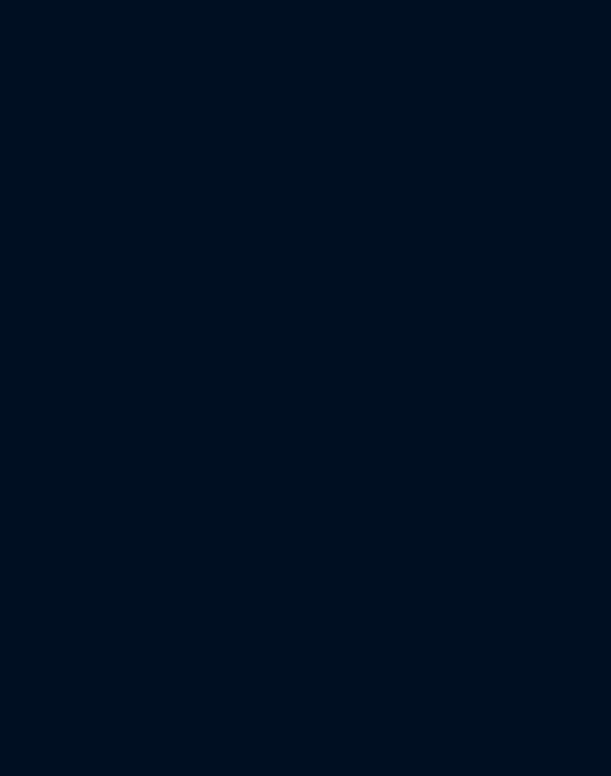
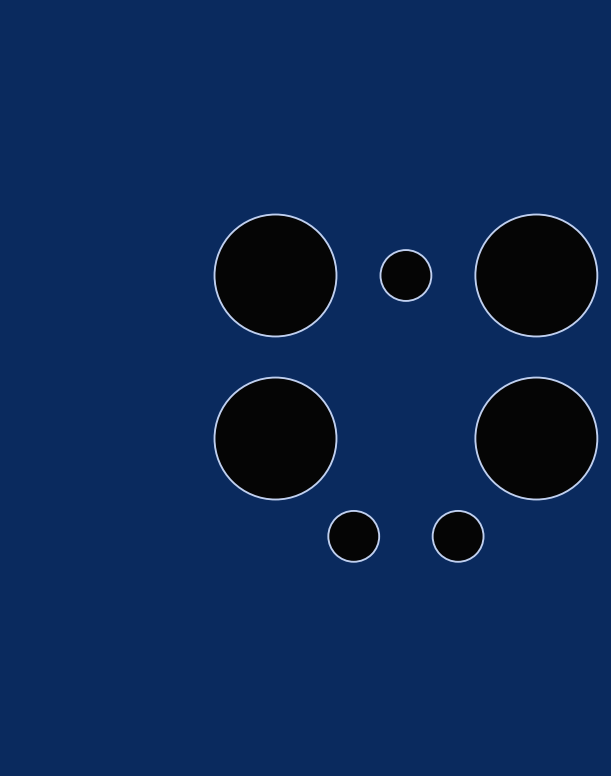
part: none -> (405, 388)

